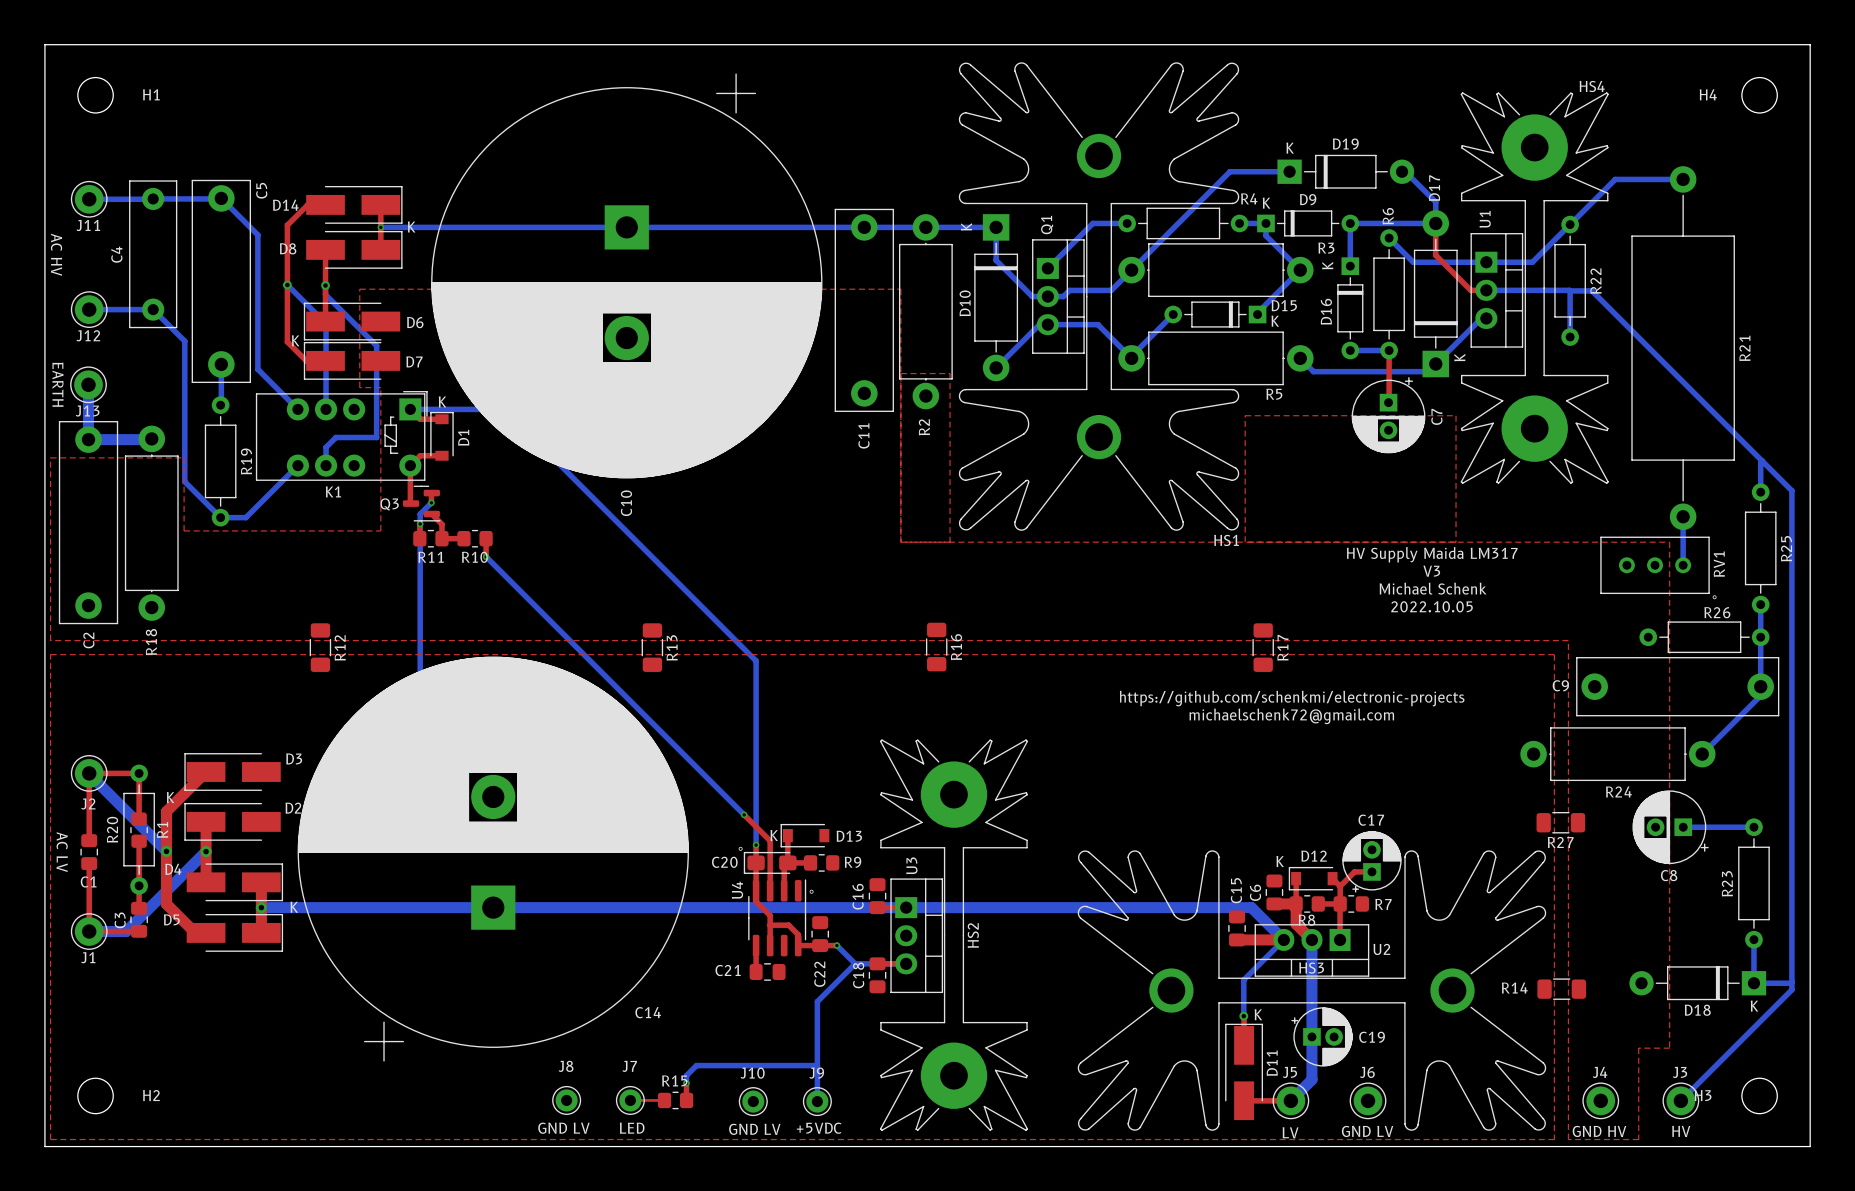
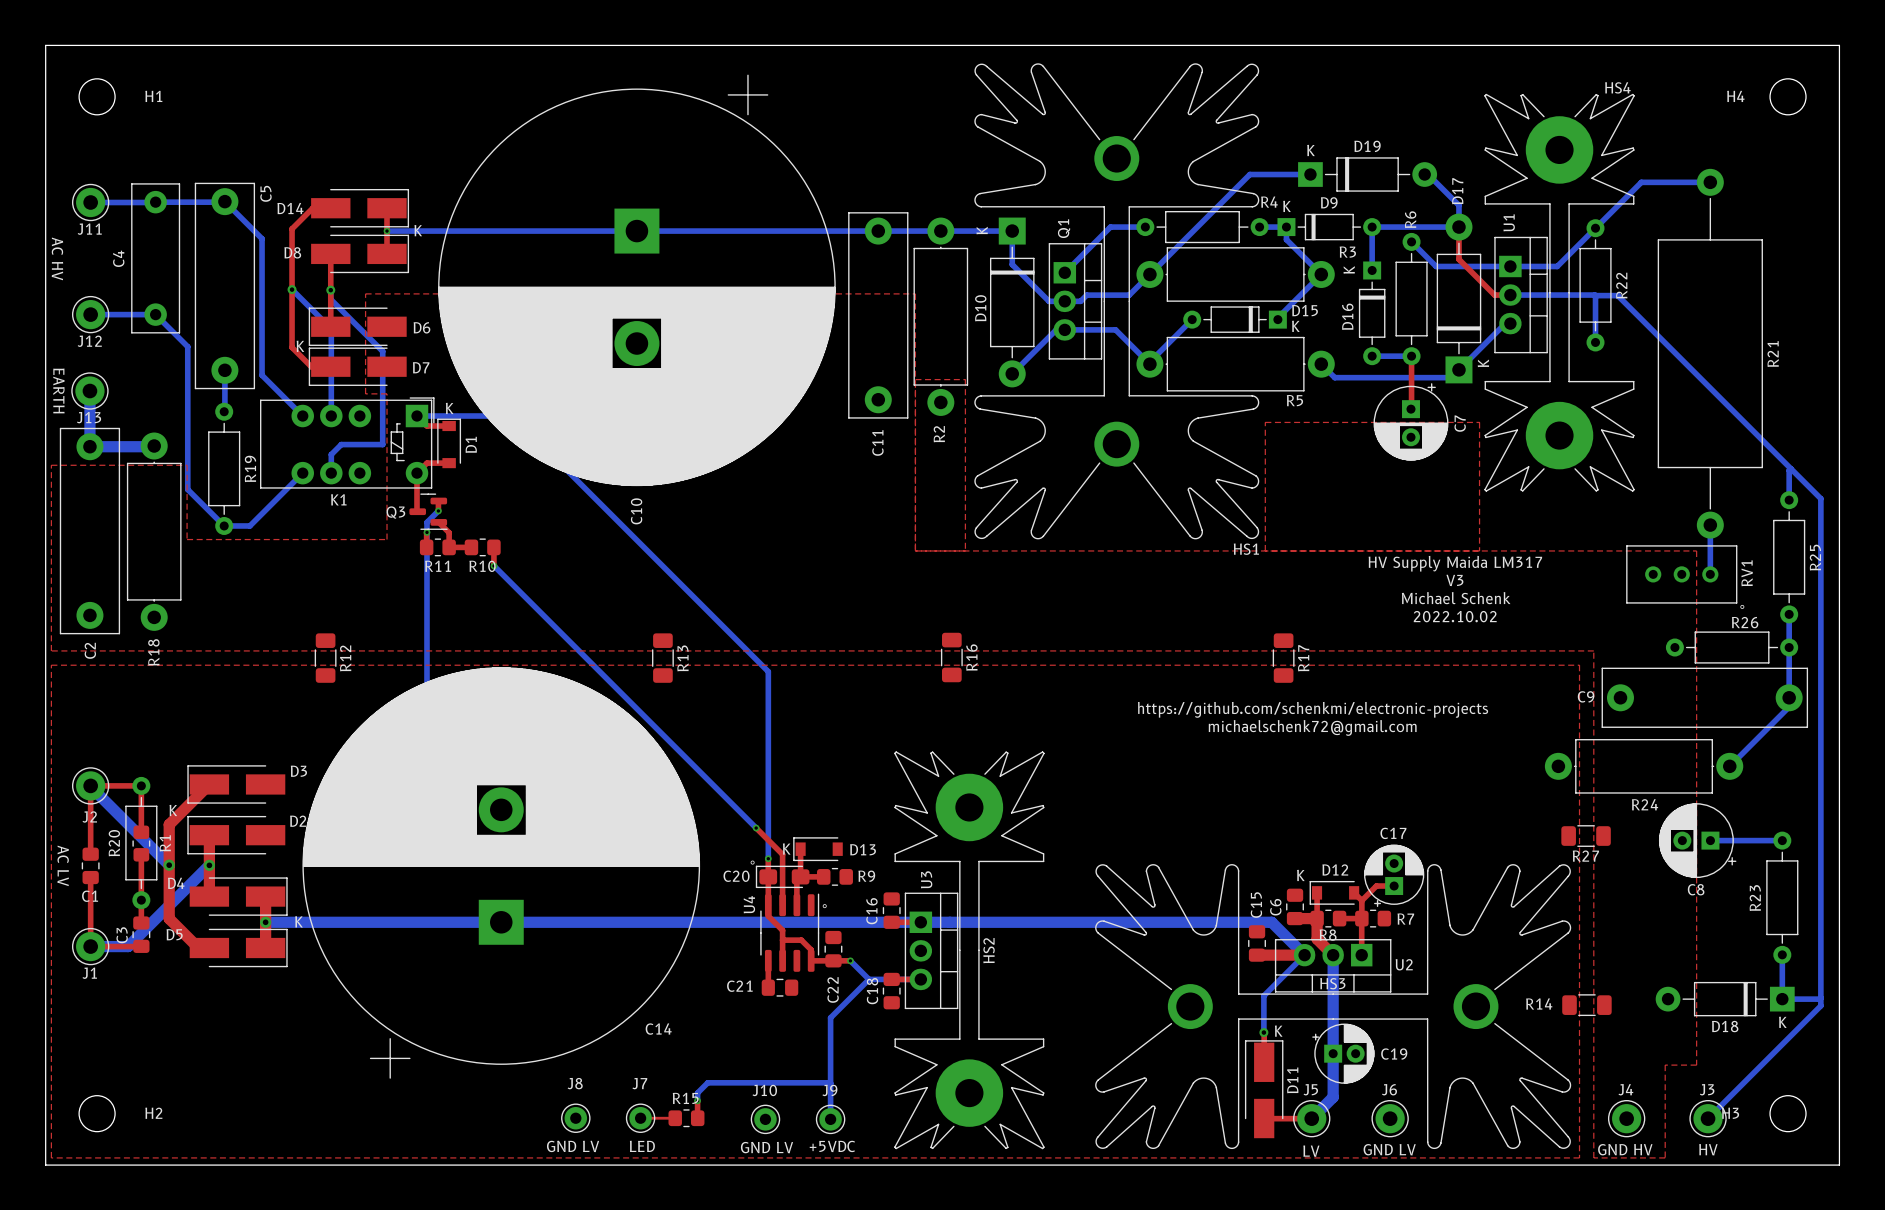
text: 2022.10.05 (1432, 606) -> 2022.10.02 (1455, 616)

